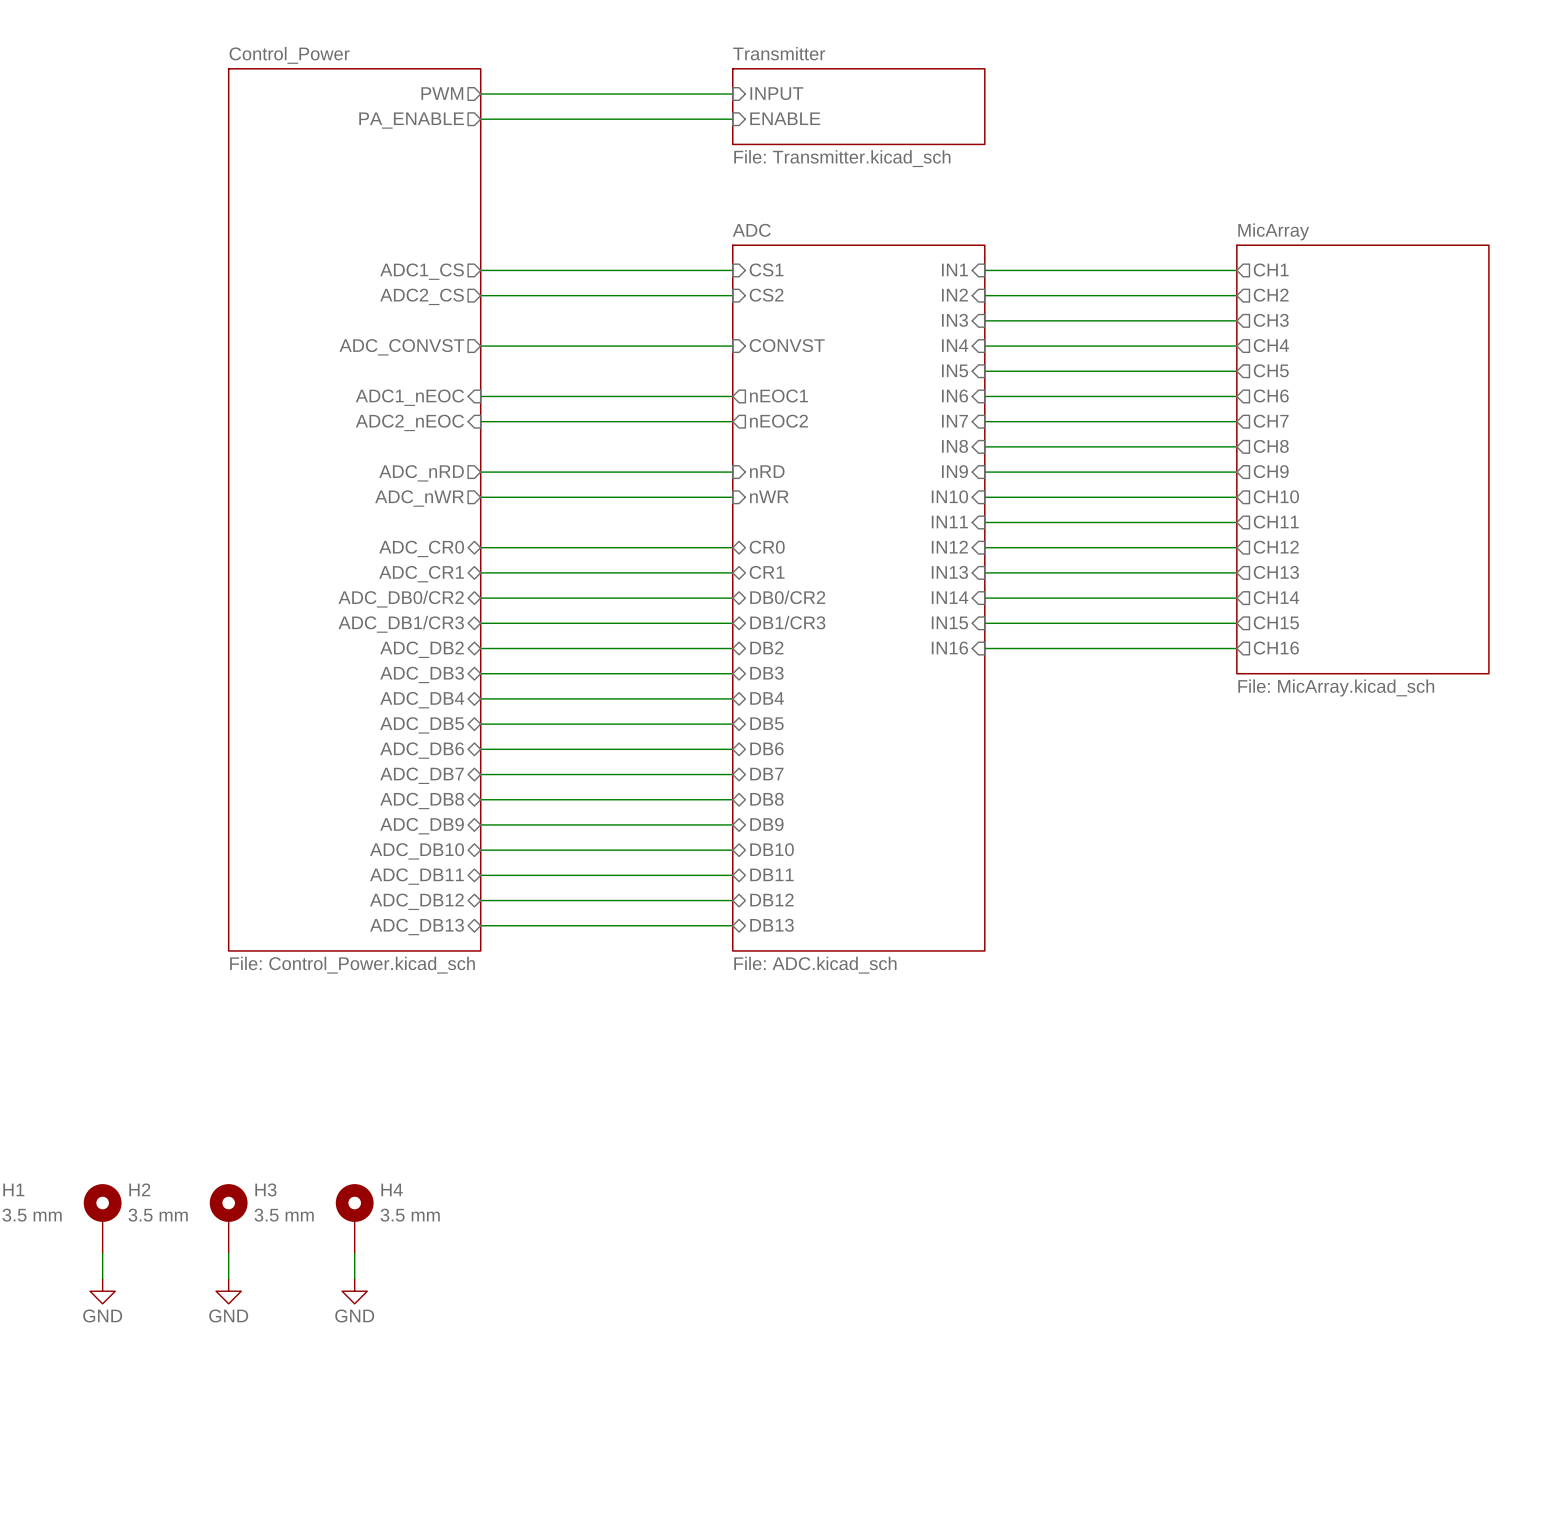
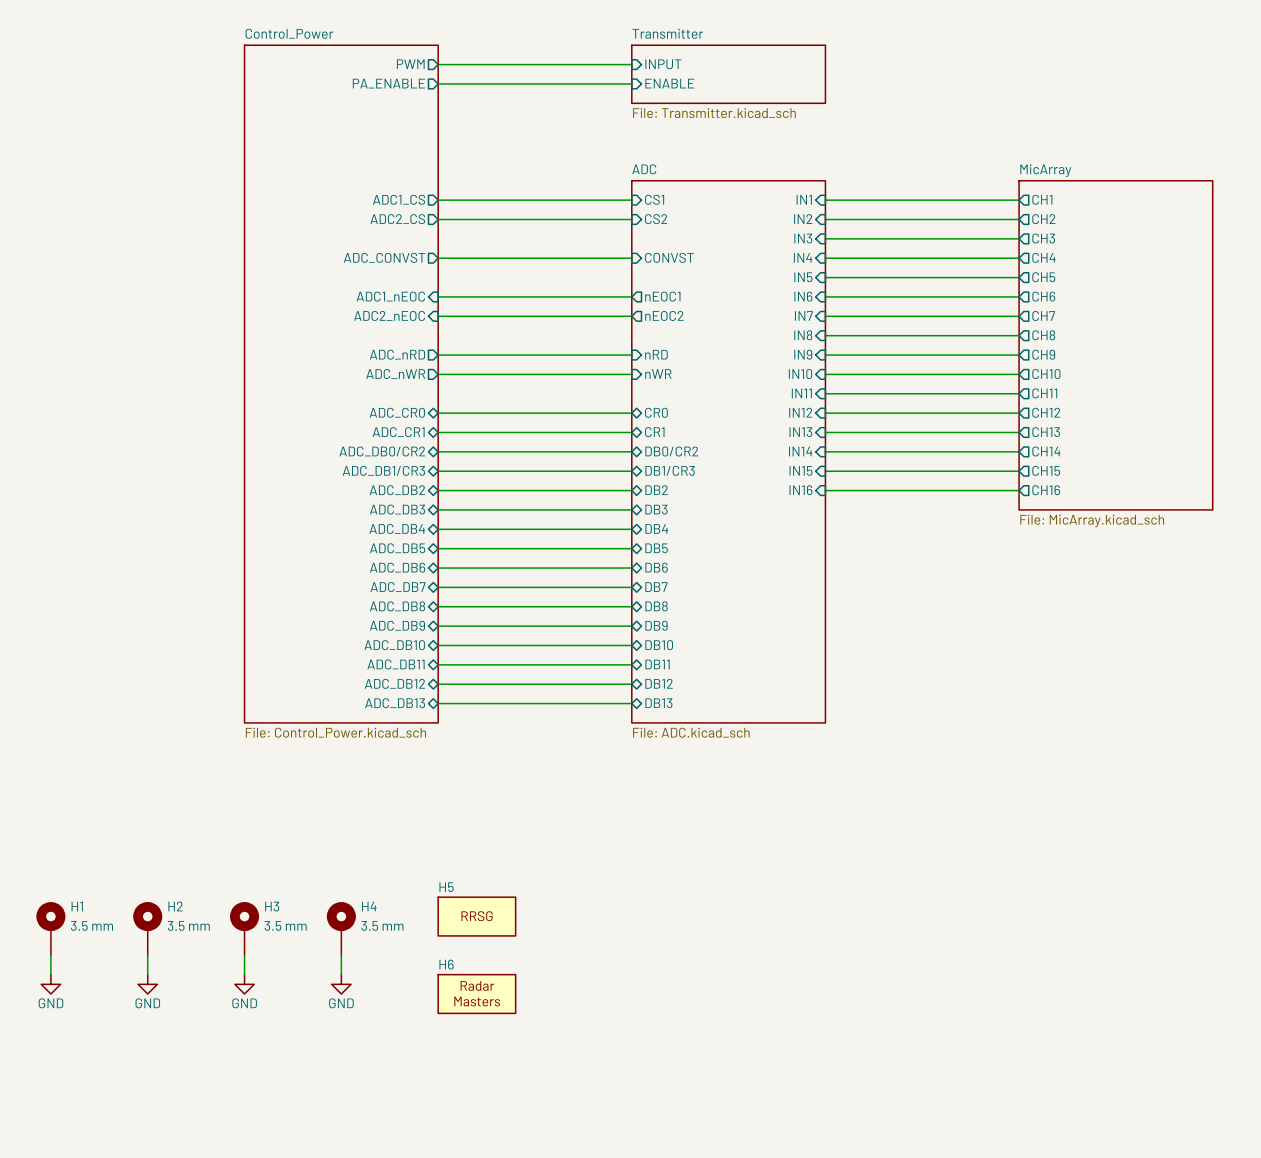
H5: none -> (476, 916)
H6: none -> (476, 994)

